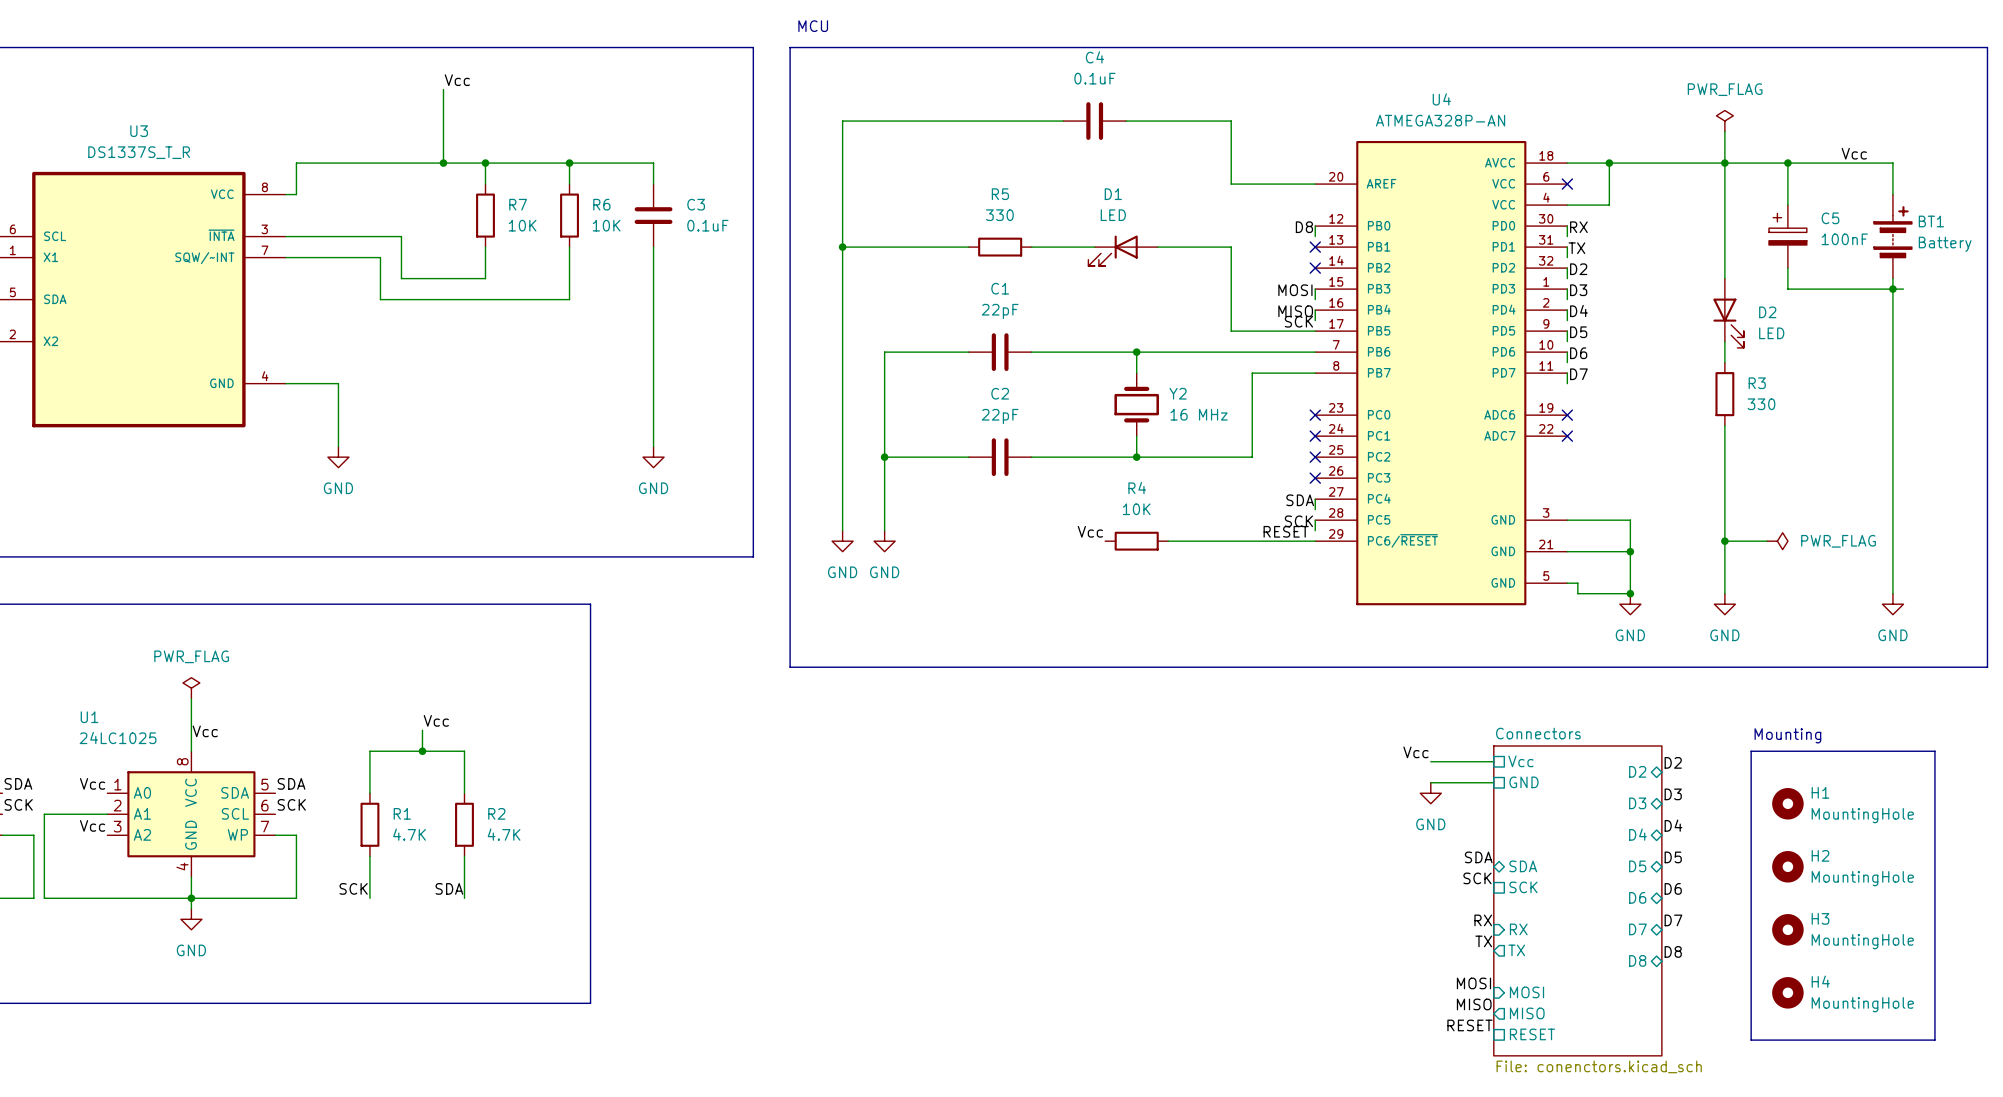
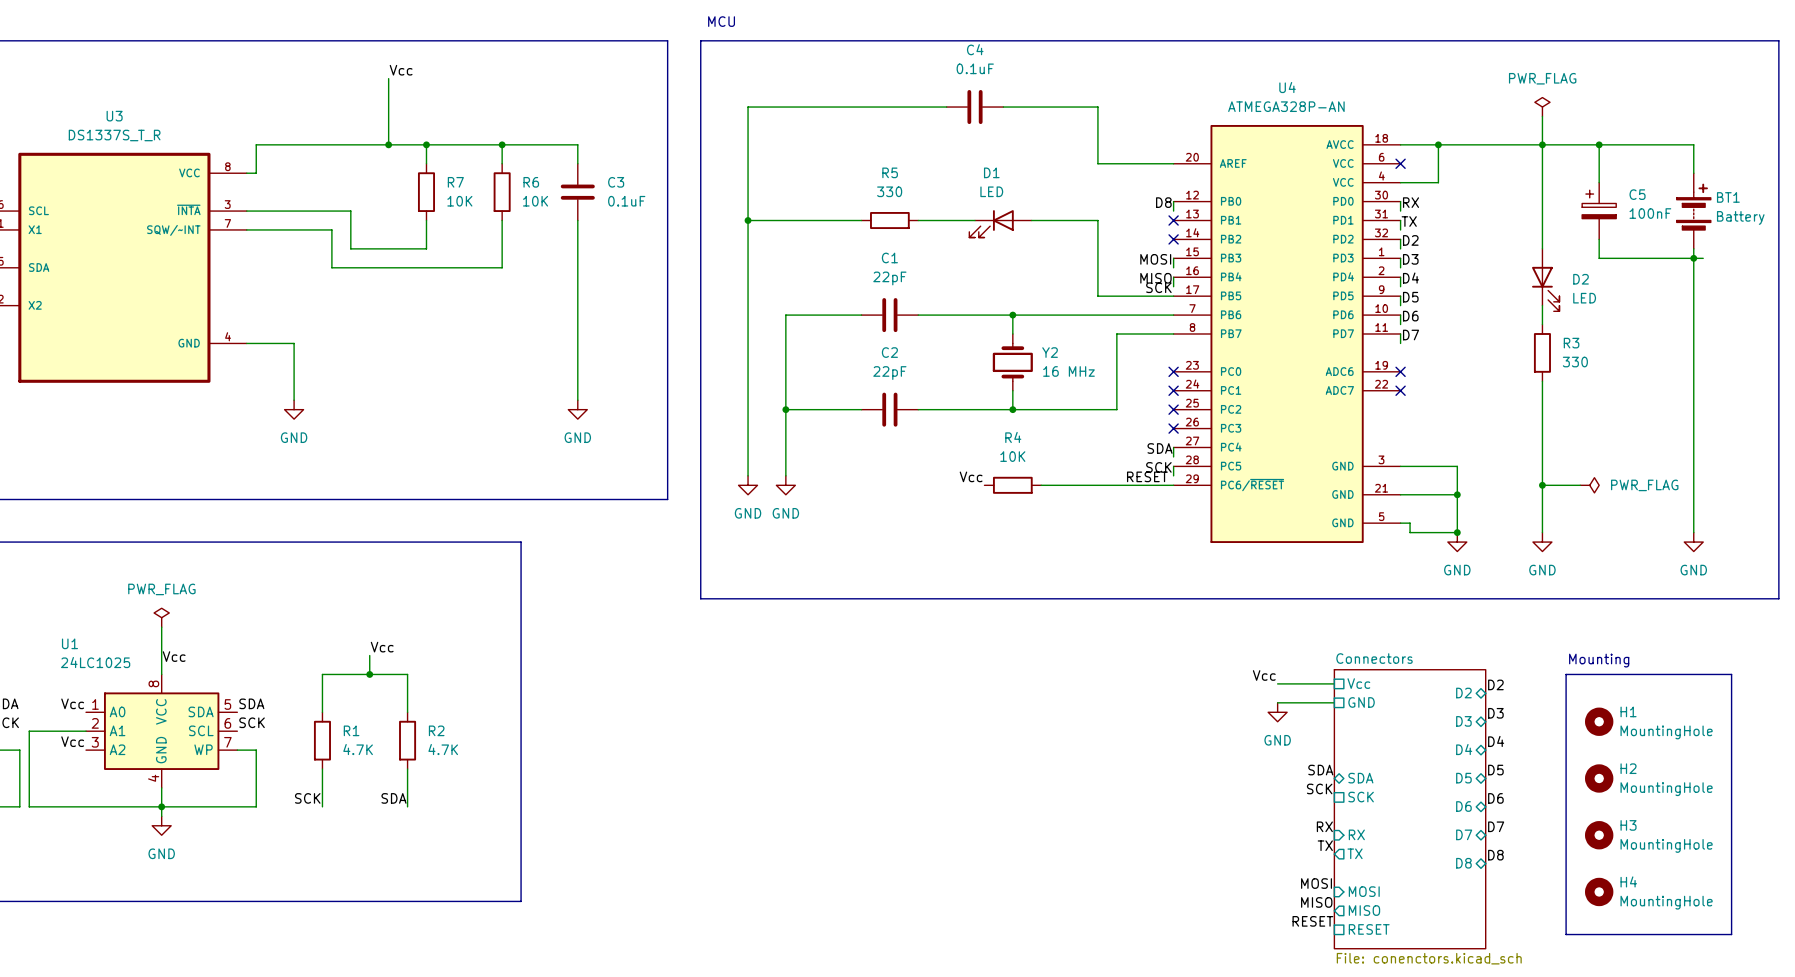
label: Vcc (1854, 153) -> none

